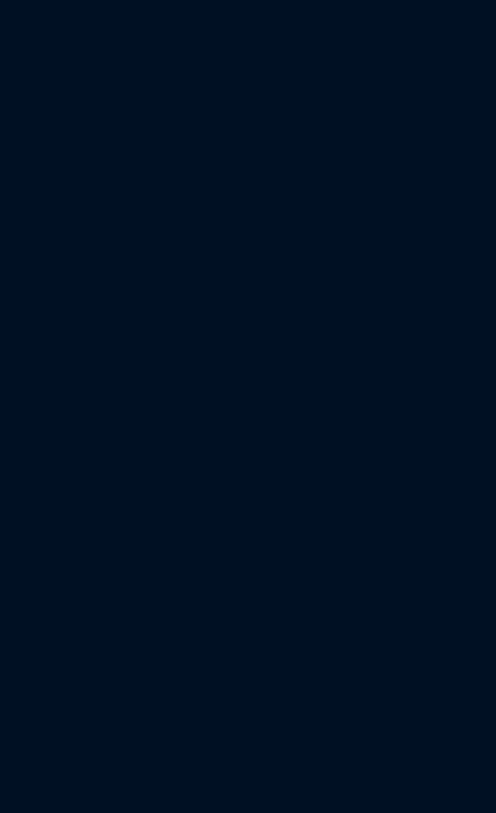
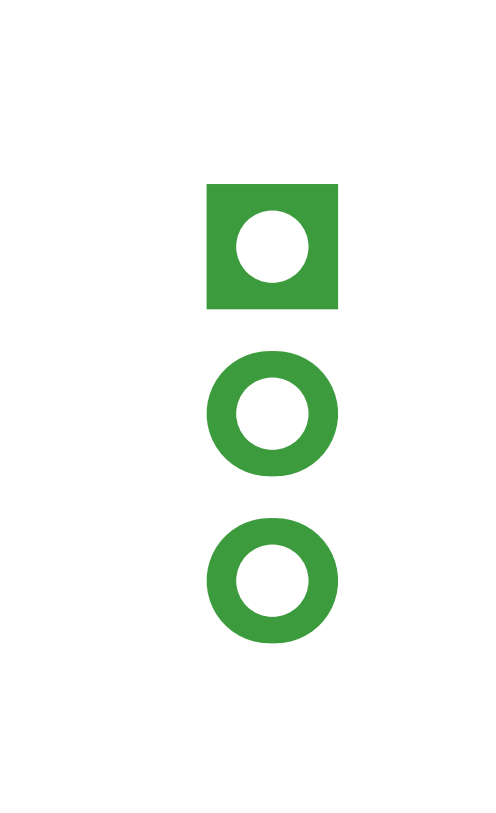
part: none -> (272, 413)

